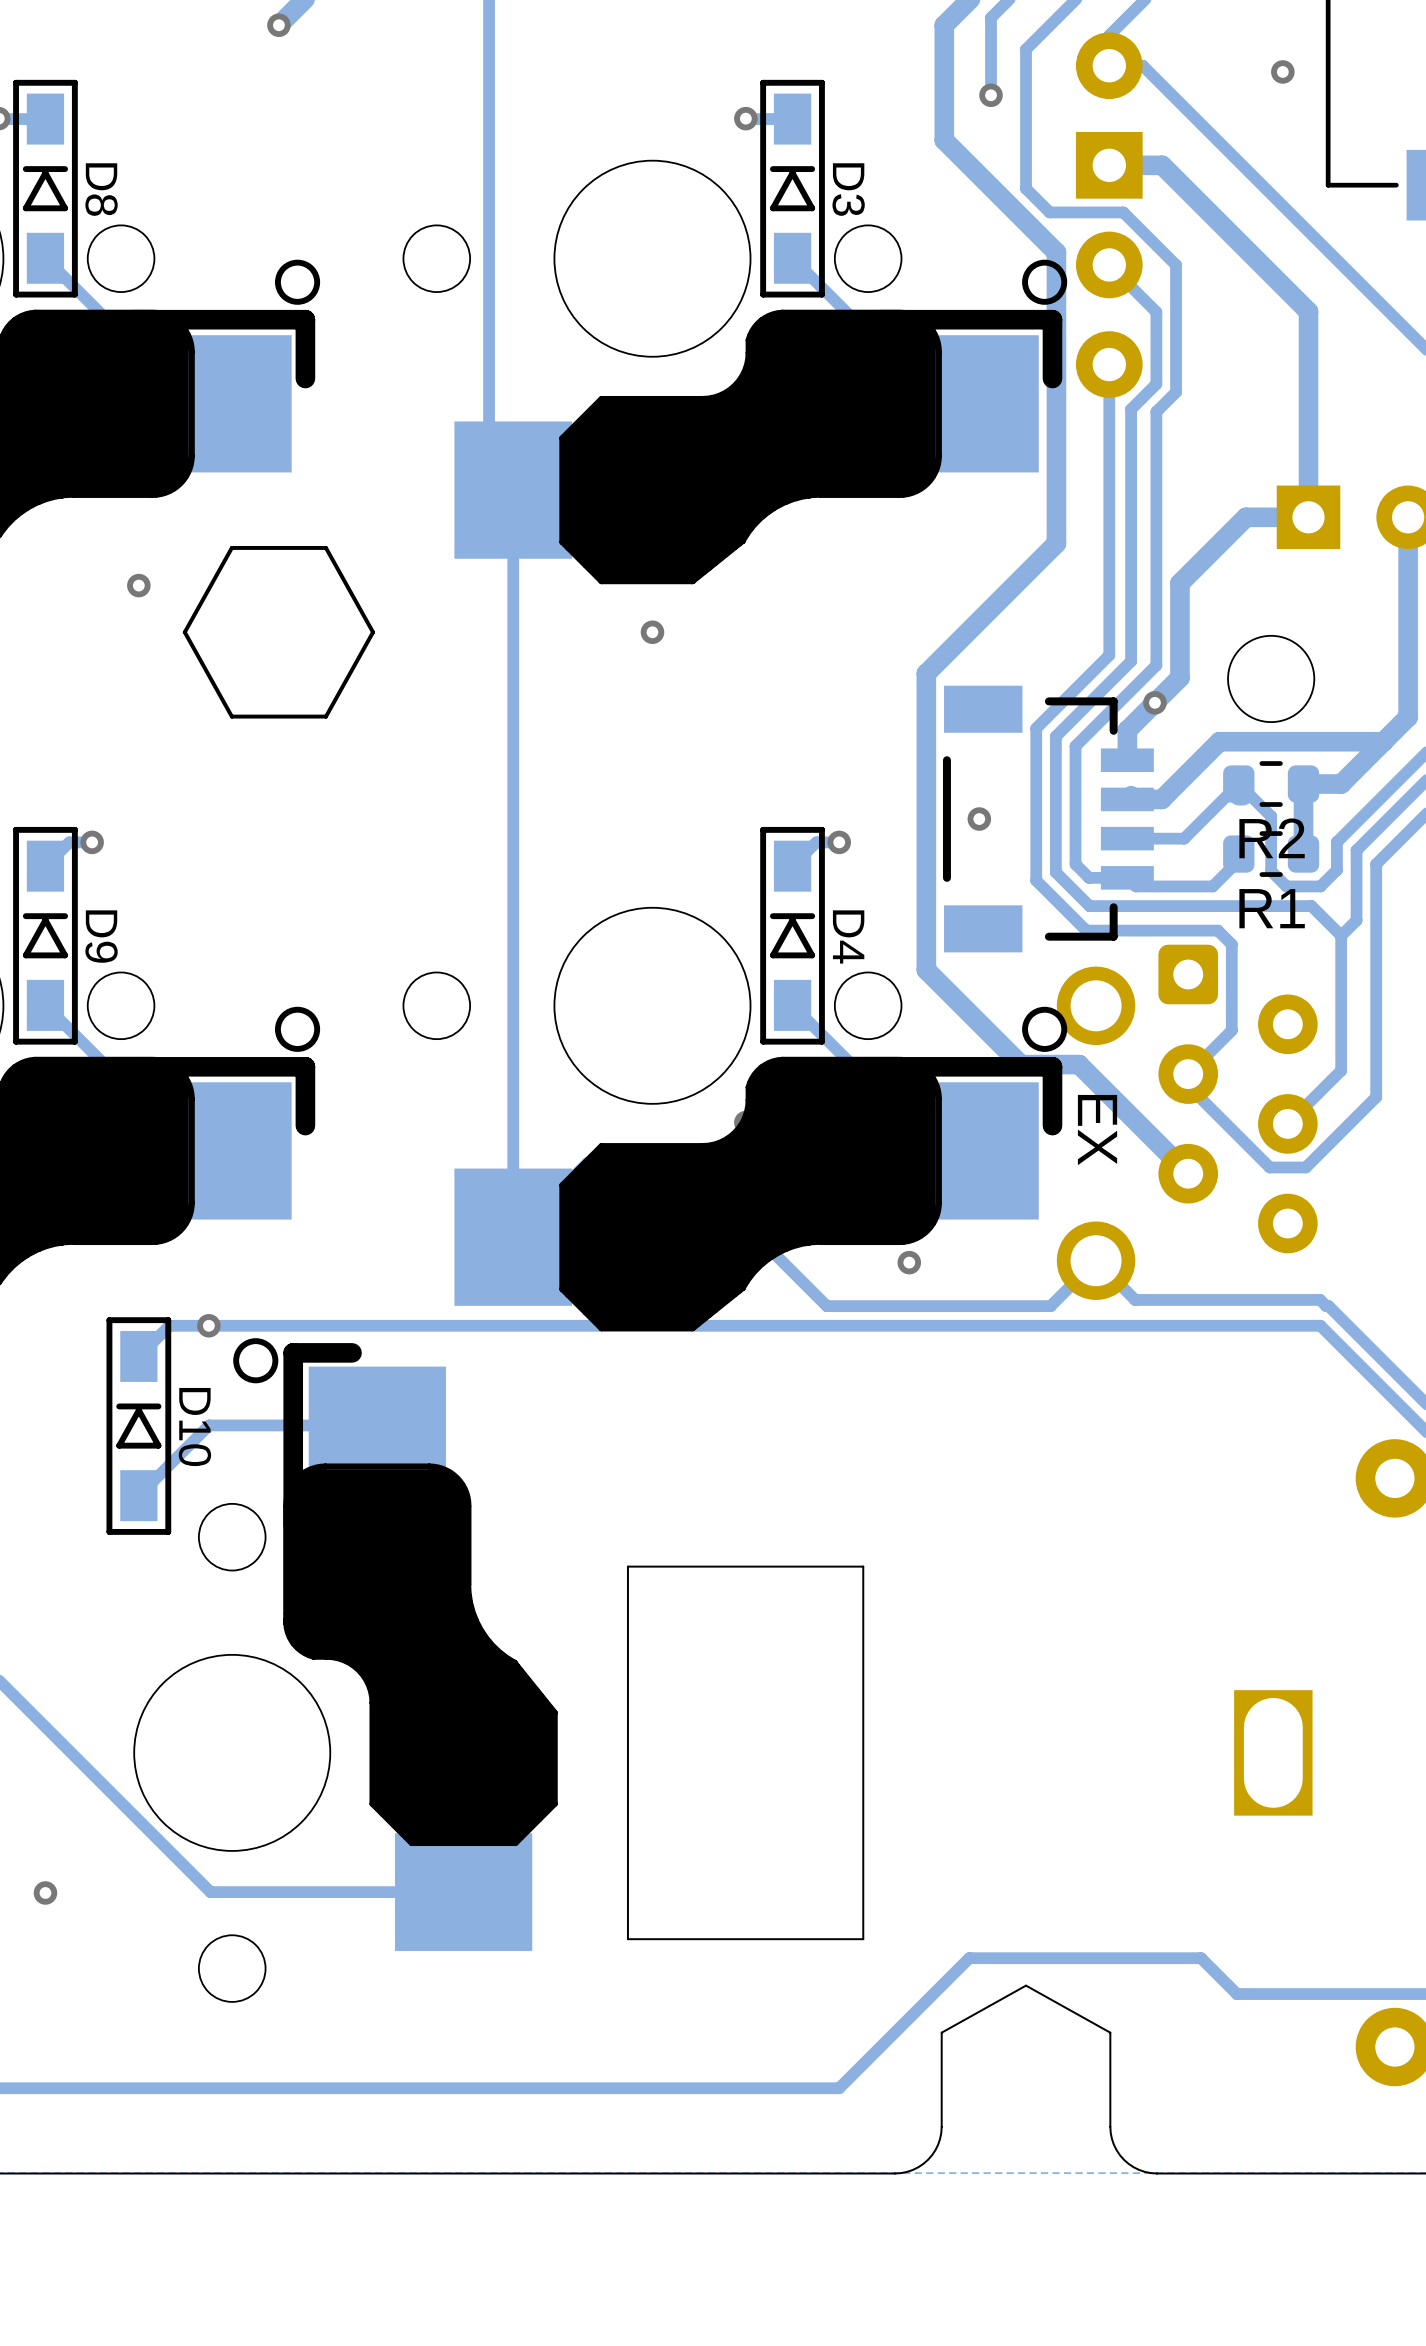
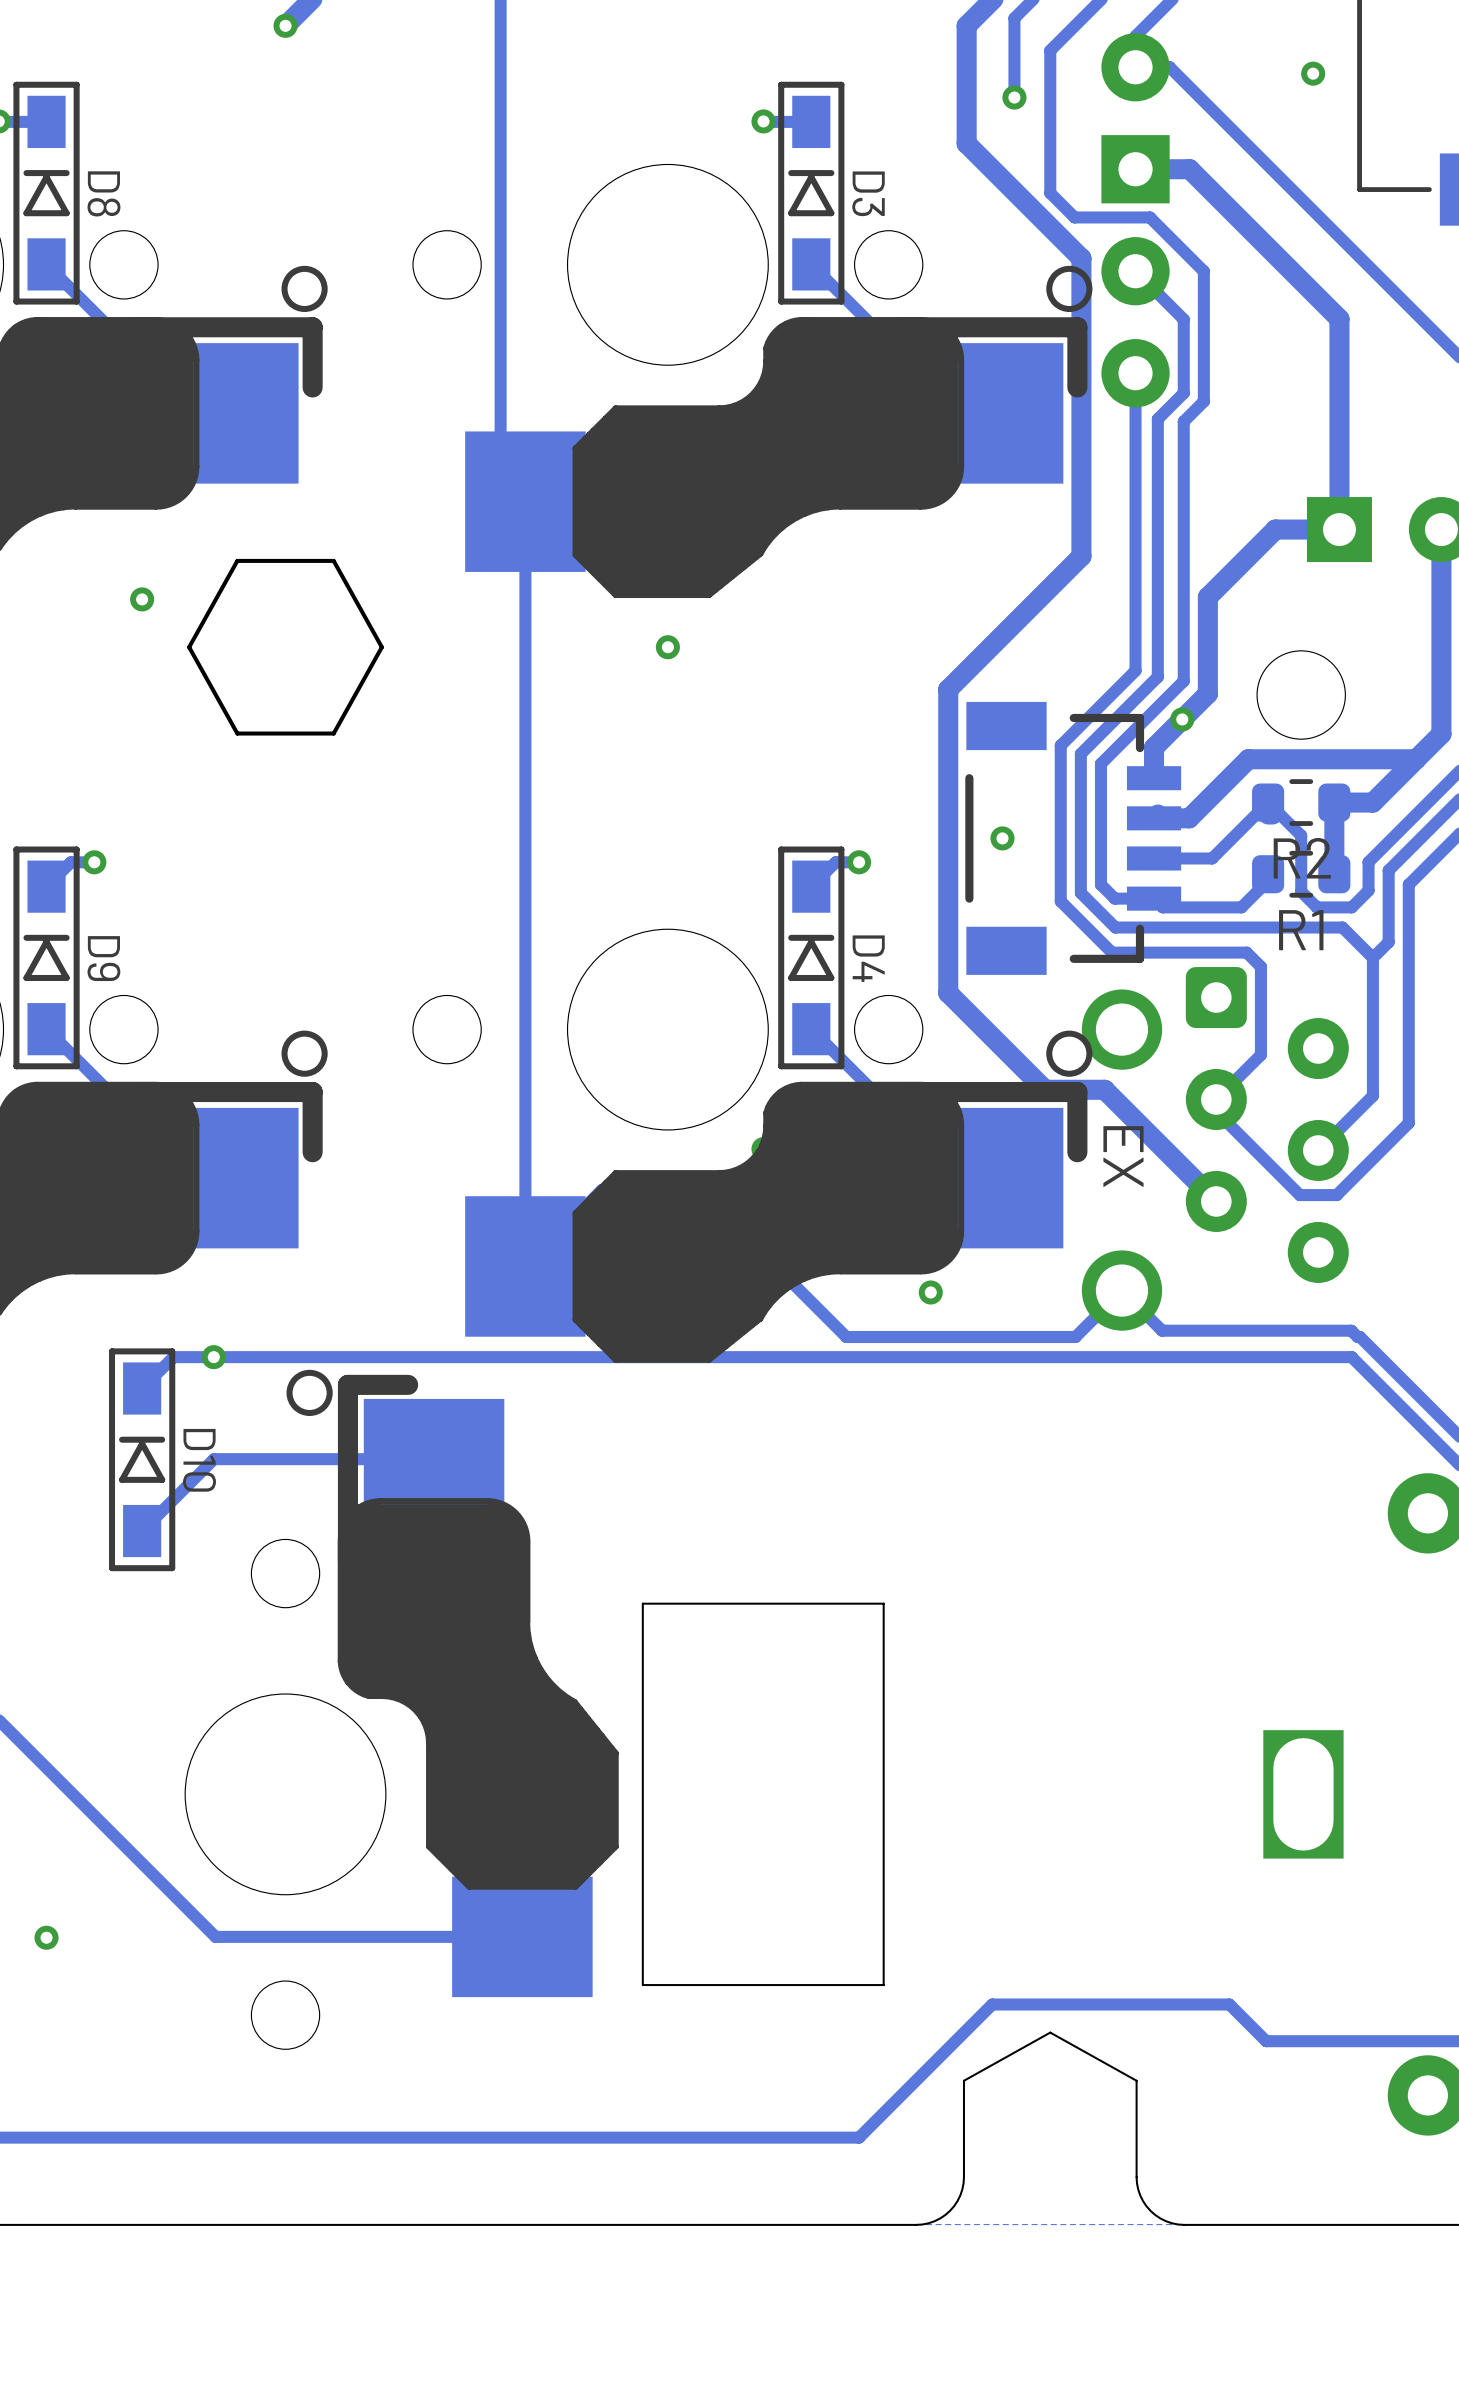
part position: (345, 1670) -> (401, 1709)

